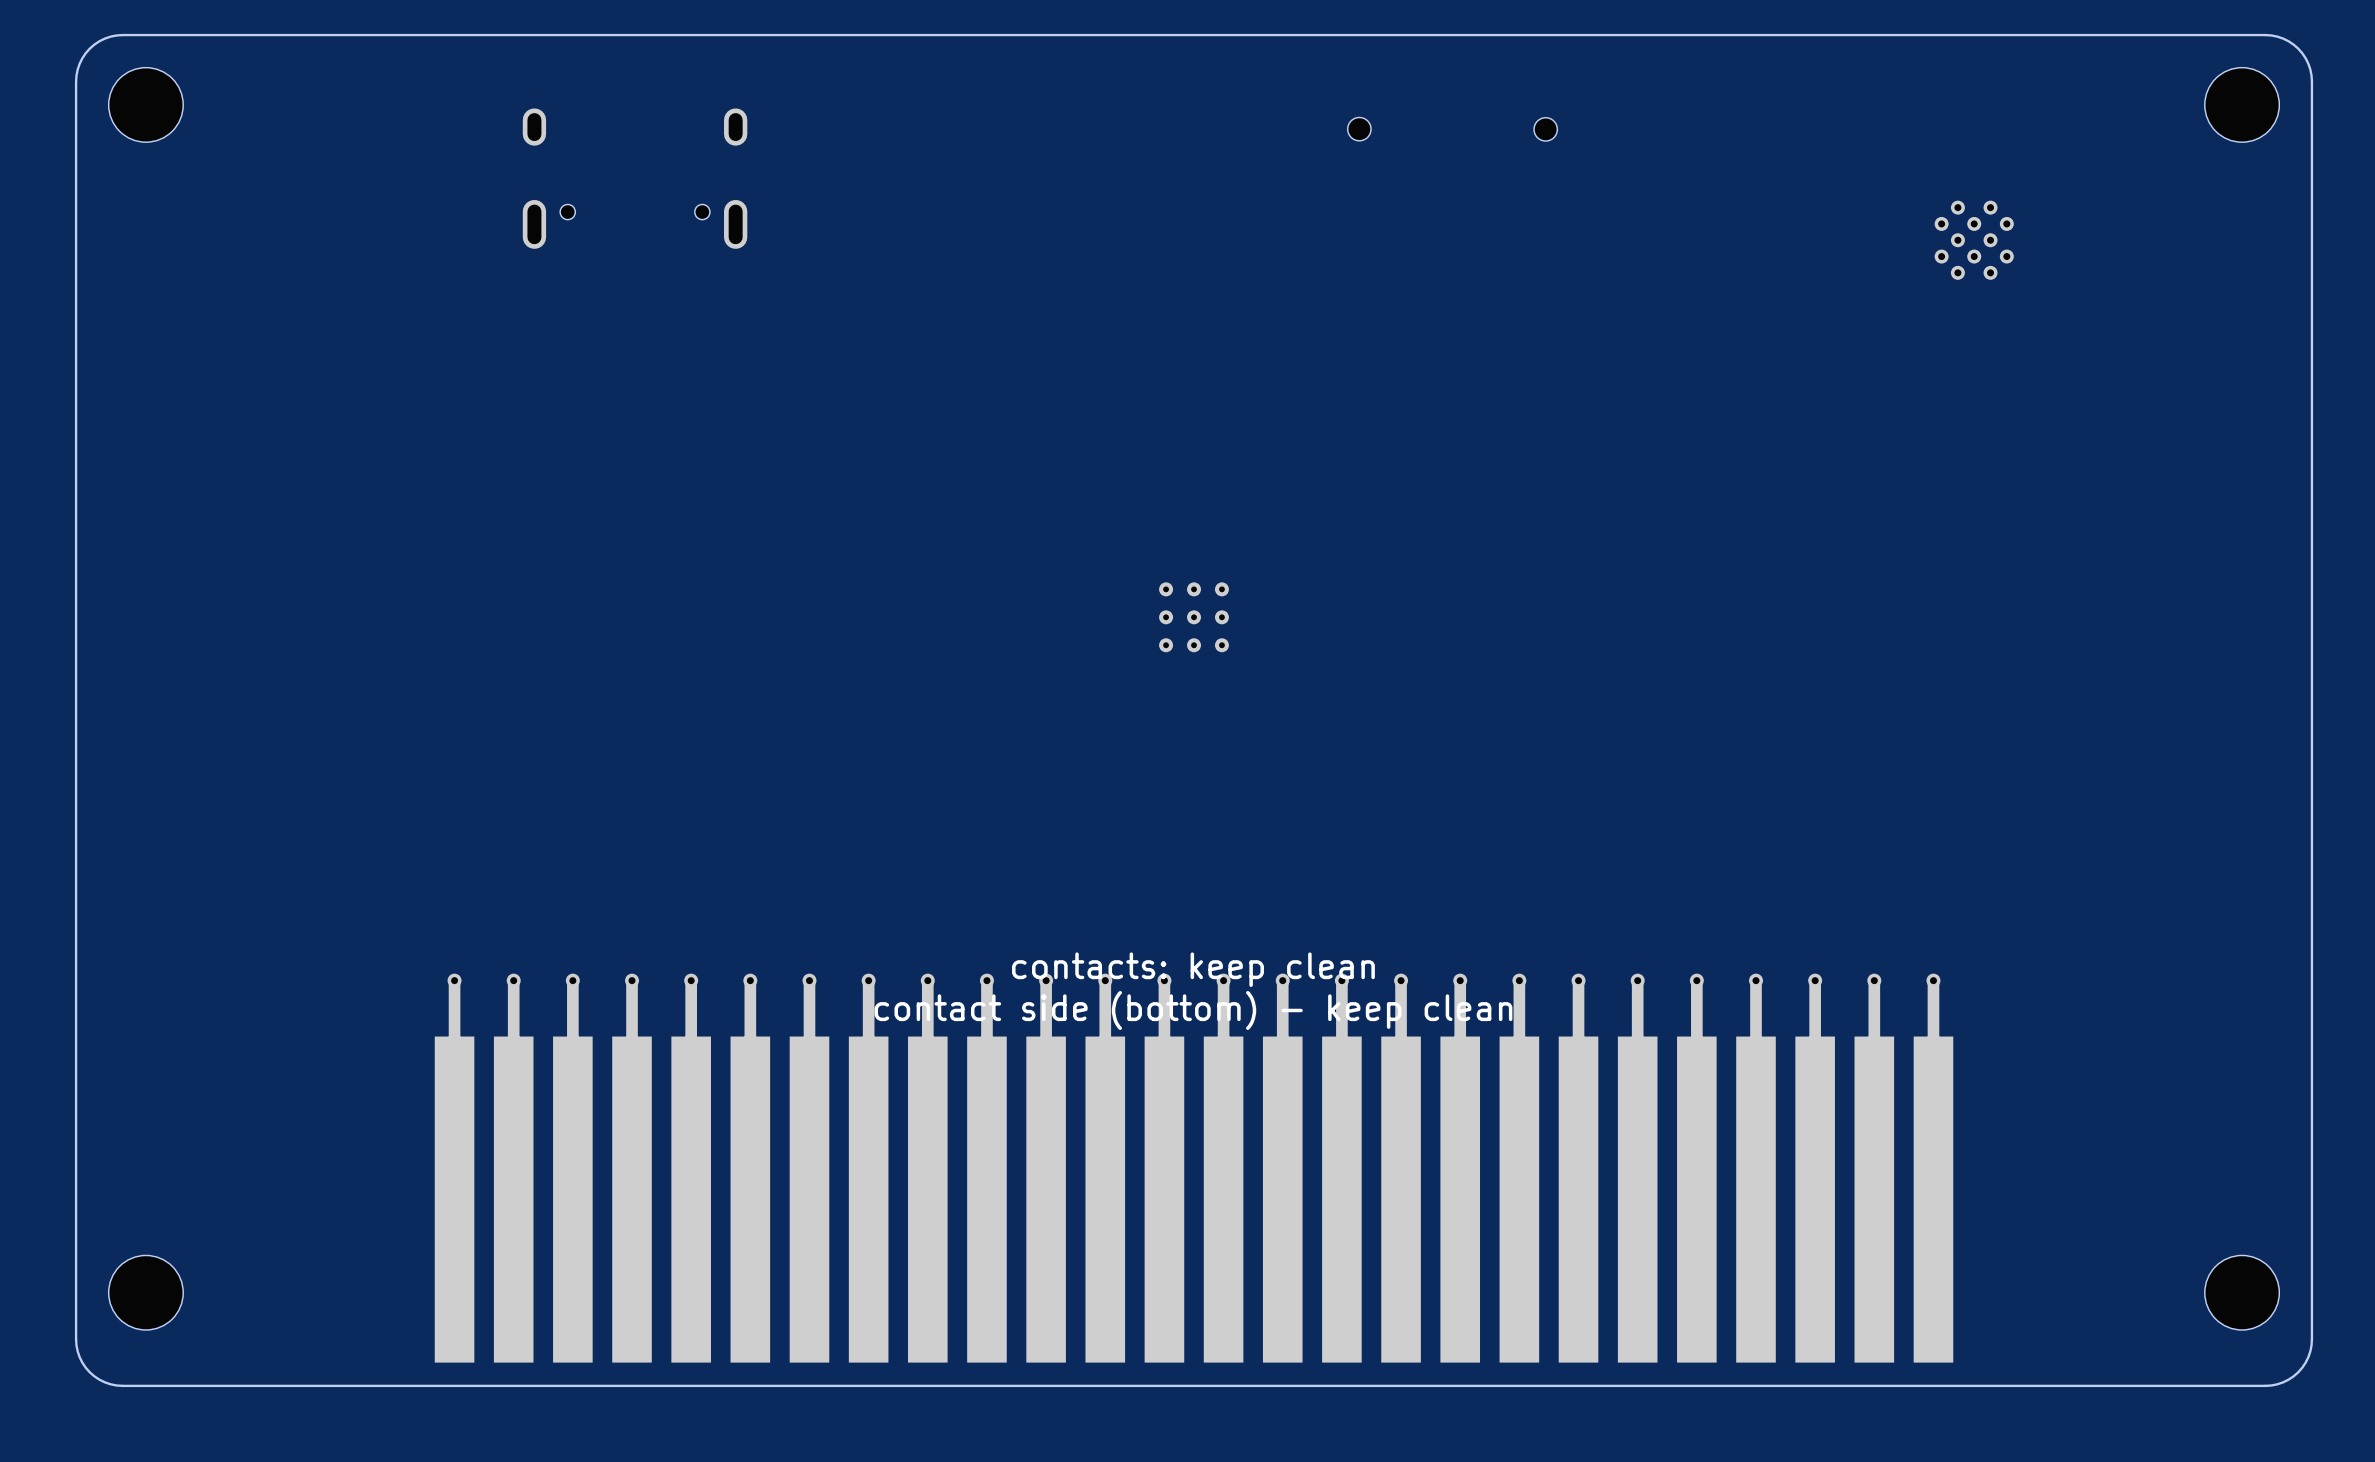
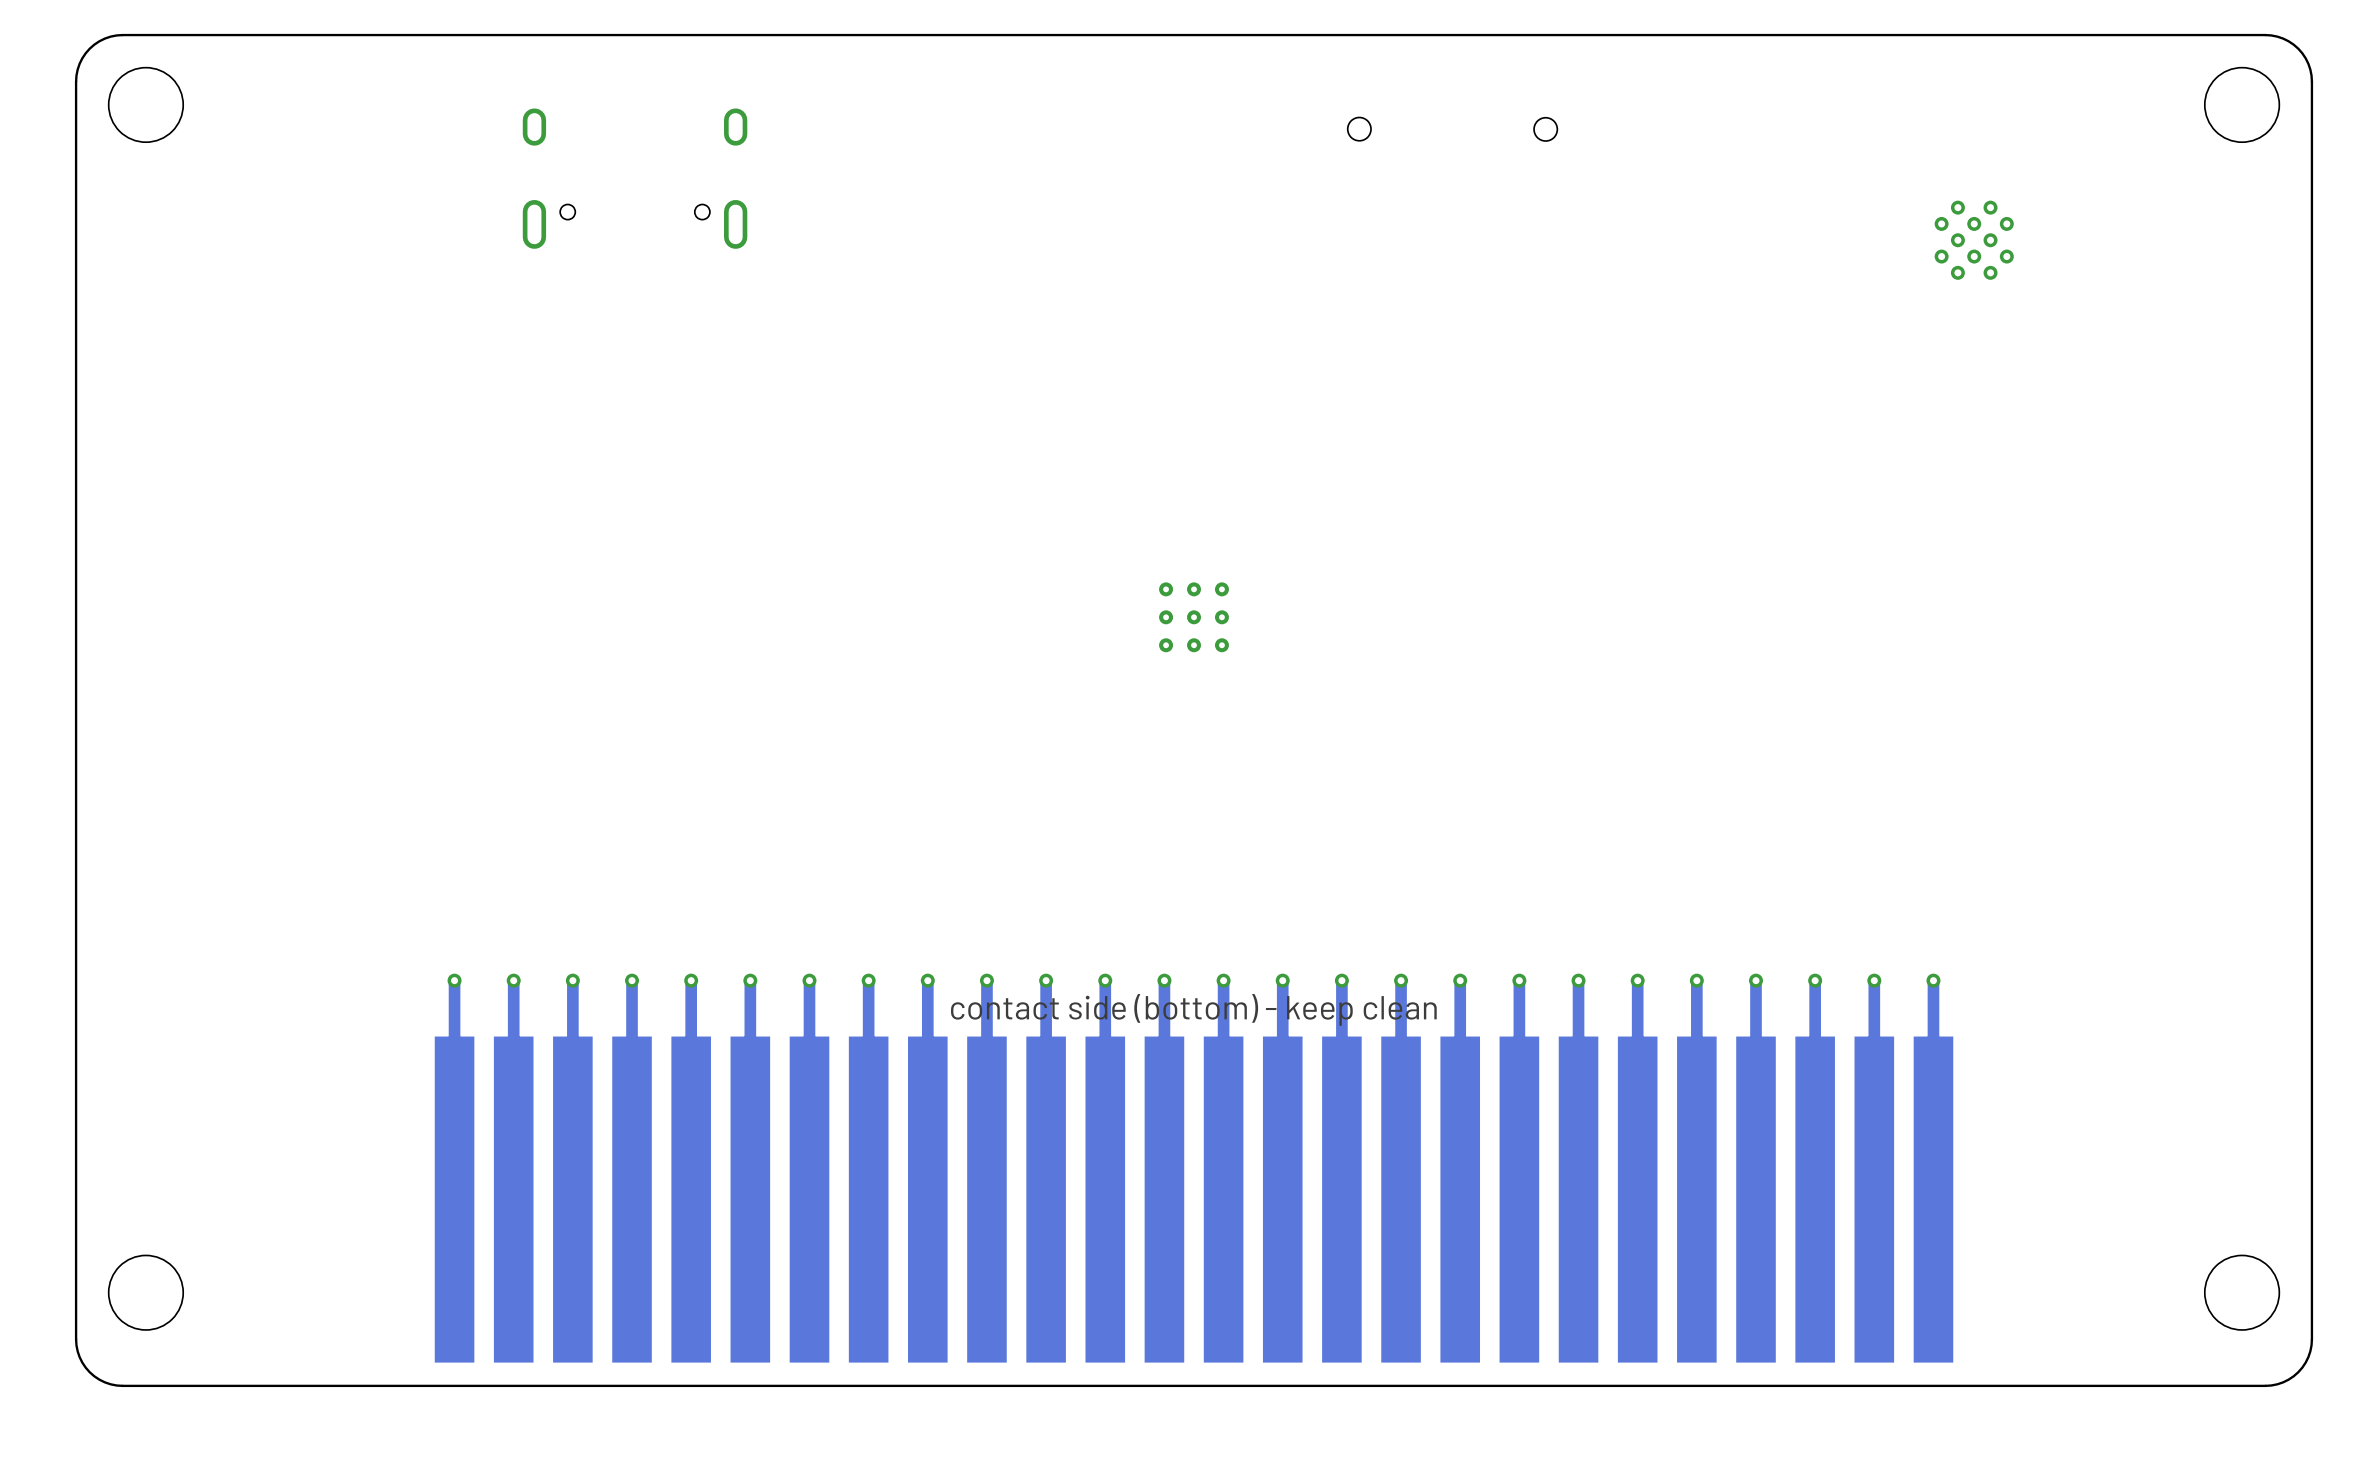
text: contacts: keep clean (1193, 969) -> none

